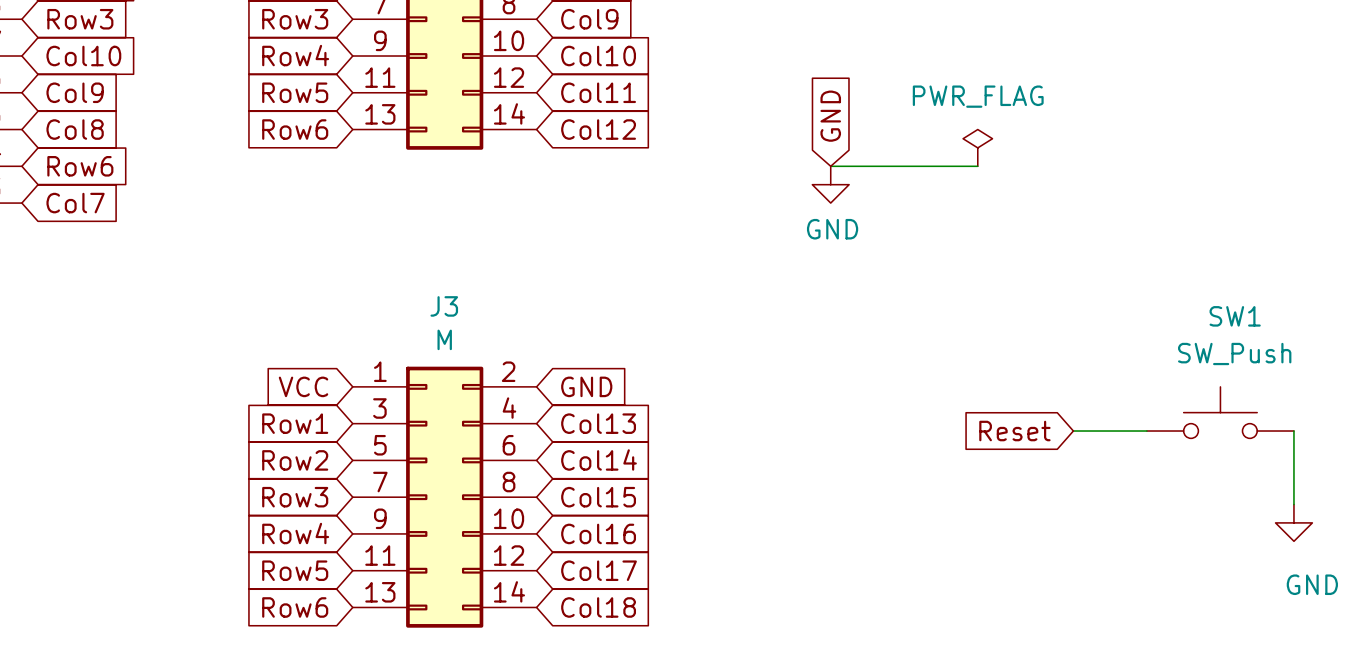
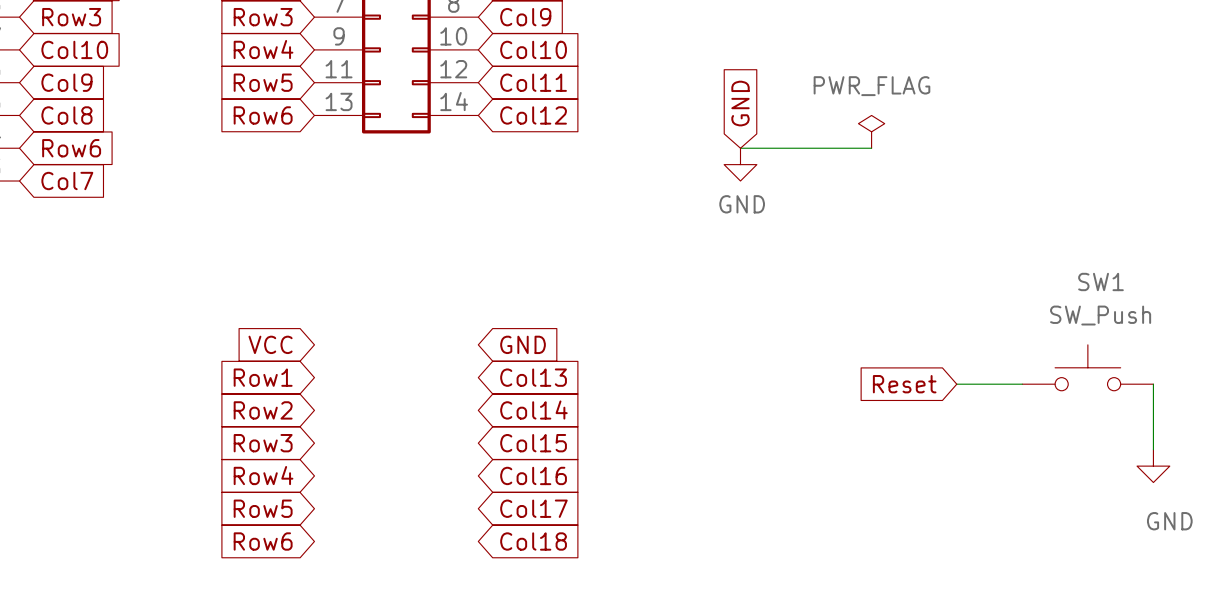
J3: M (444, 497) -> none

